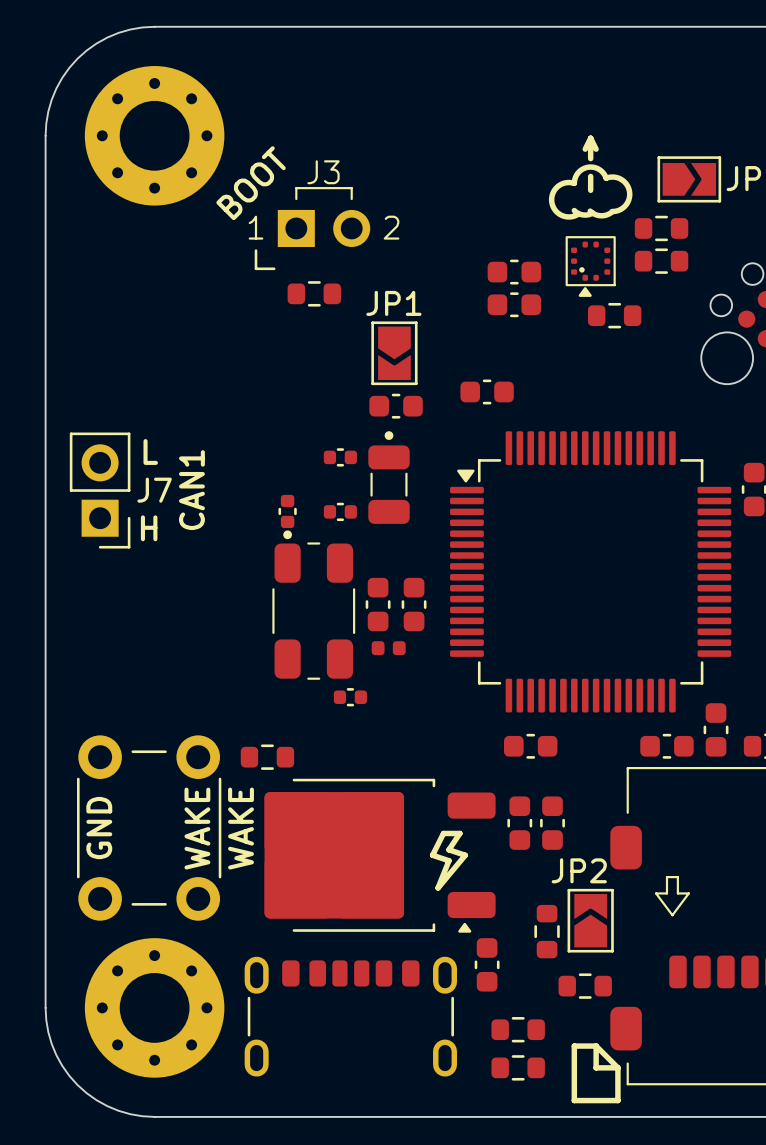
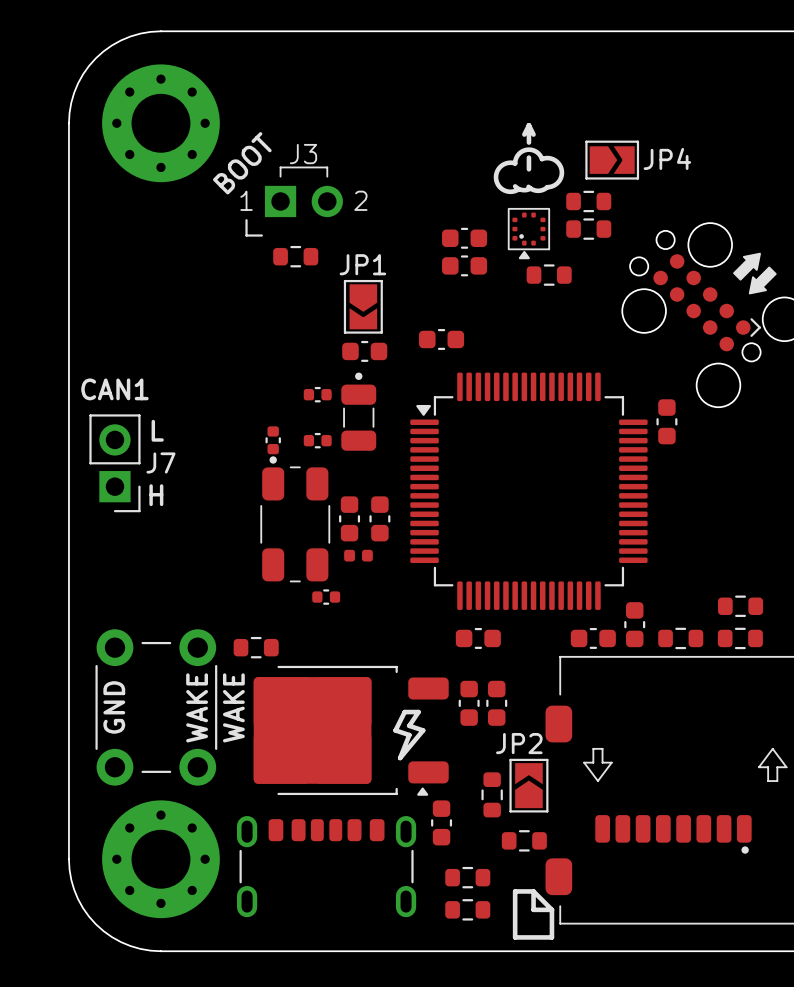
text position: L (150, 451) -> L (157, 430)
J7 position: (100, 490) -> (114, 463)
text rotation: 0° (191, 490) -> 90° clockwise (114, 389)
text position: CAN1 (191, 490) -> CAN1 (114, 389)
text position: H (149, 528) -> H (156, 495)

